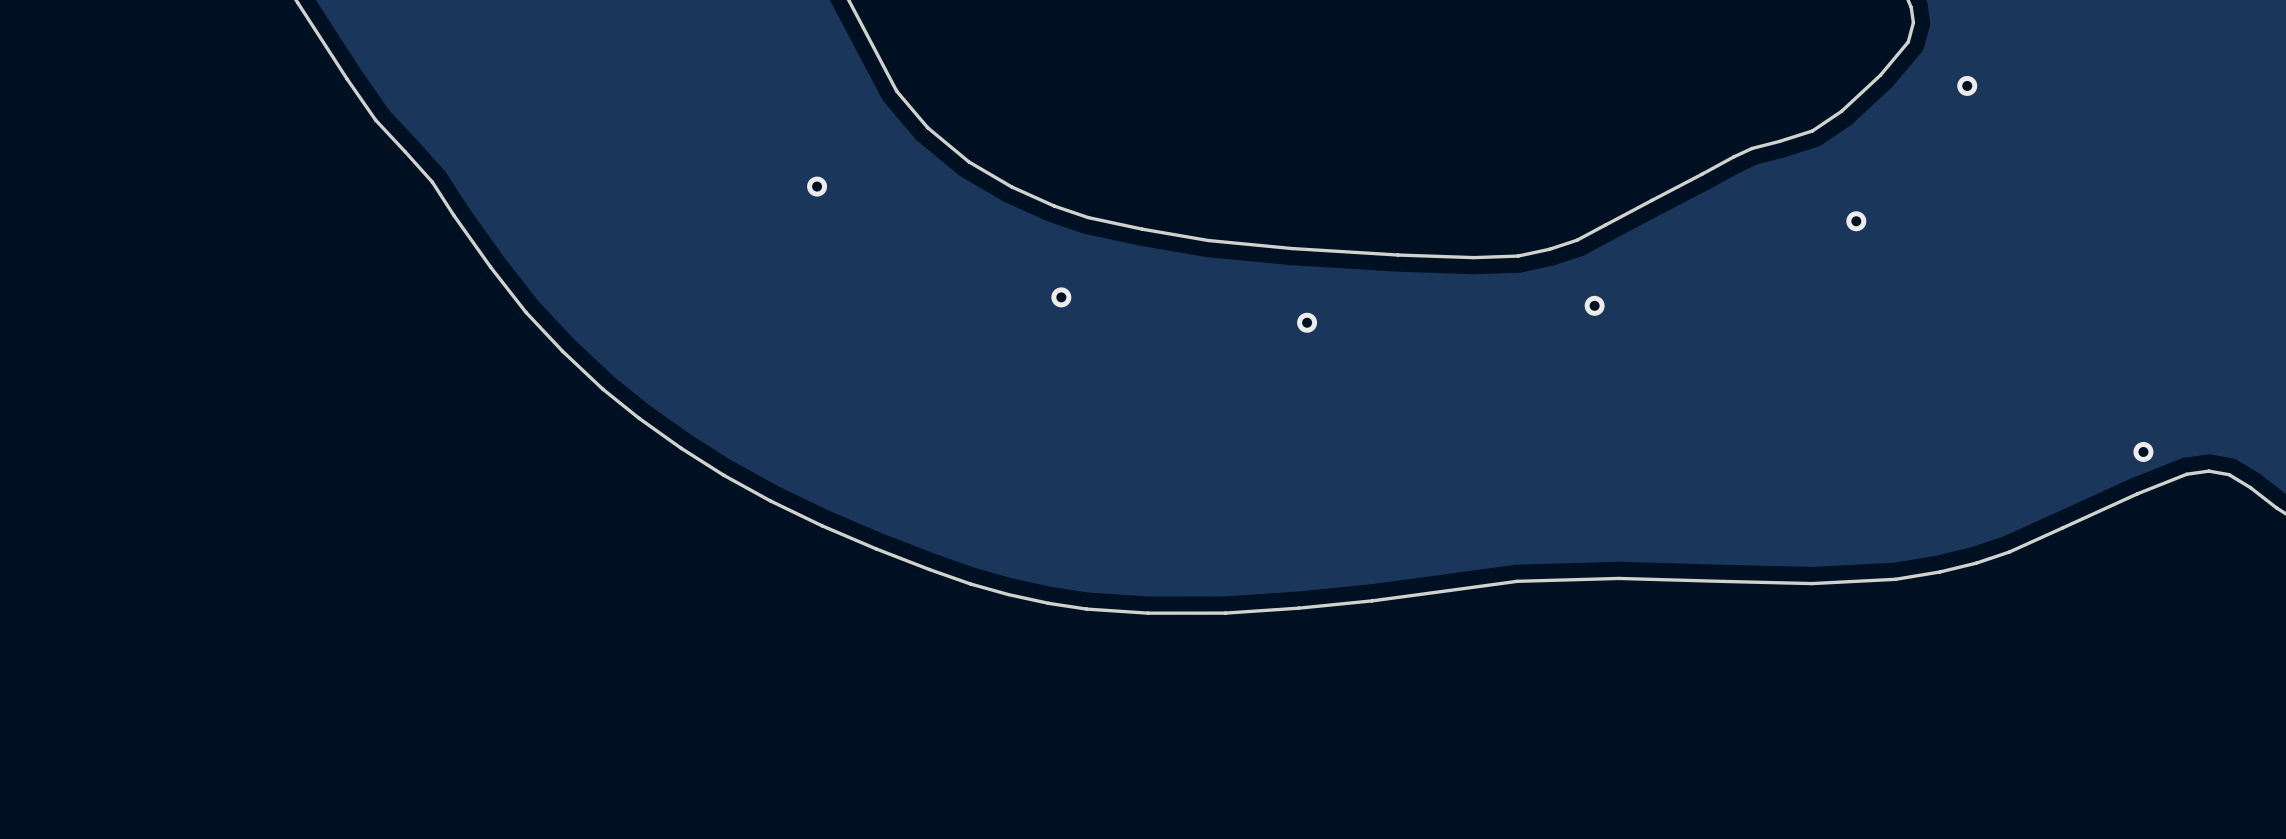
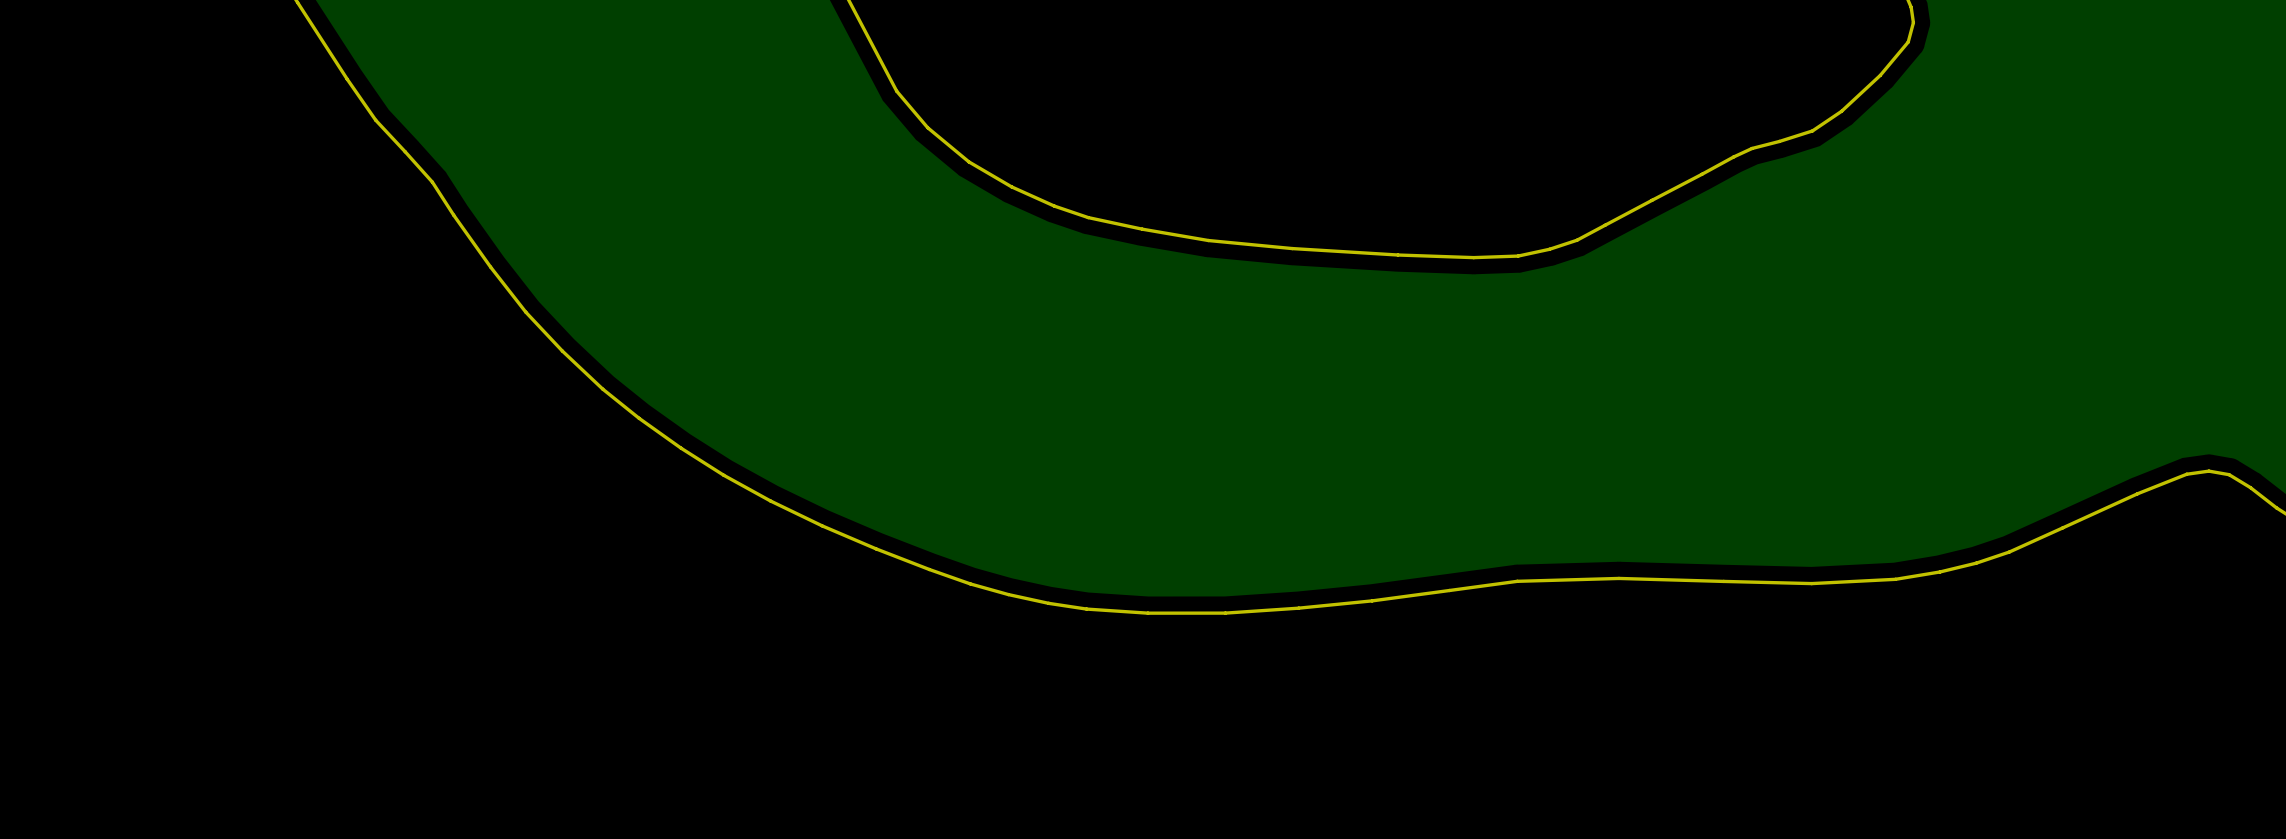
via: (1967, 85) -> none
via: (817, 186) -> none
via: (1856, 221) -> none
via: (1061, 297) -> none
via: (1594, 305) -> none
via: (1307, 322) -> none
via: (2143, 451) -> none

